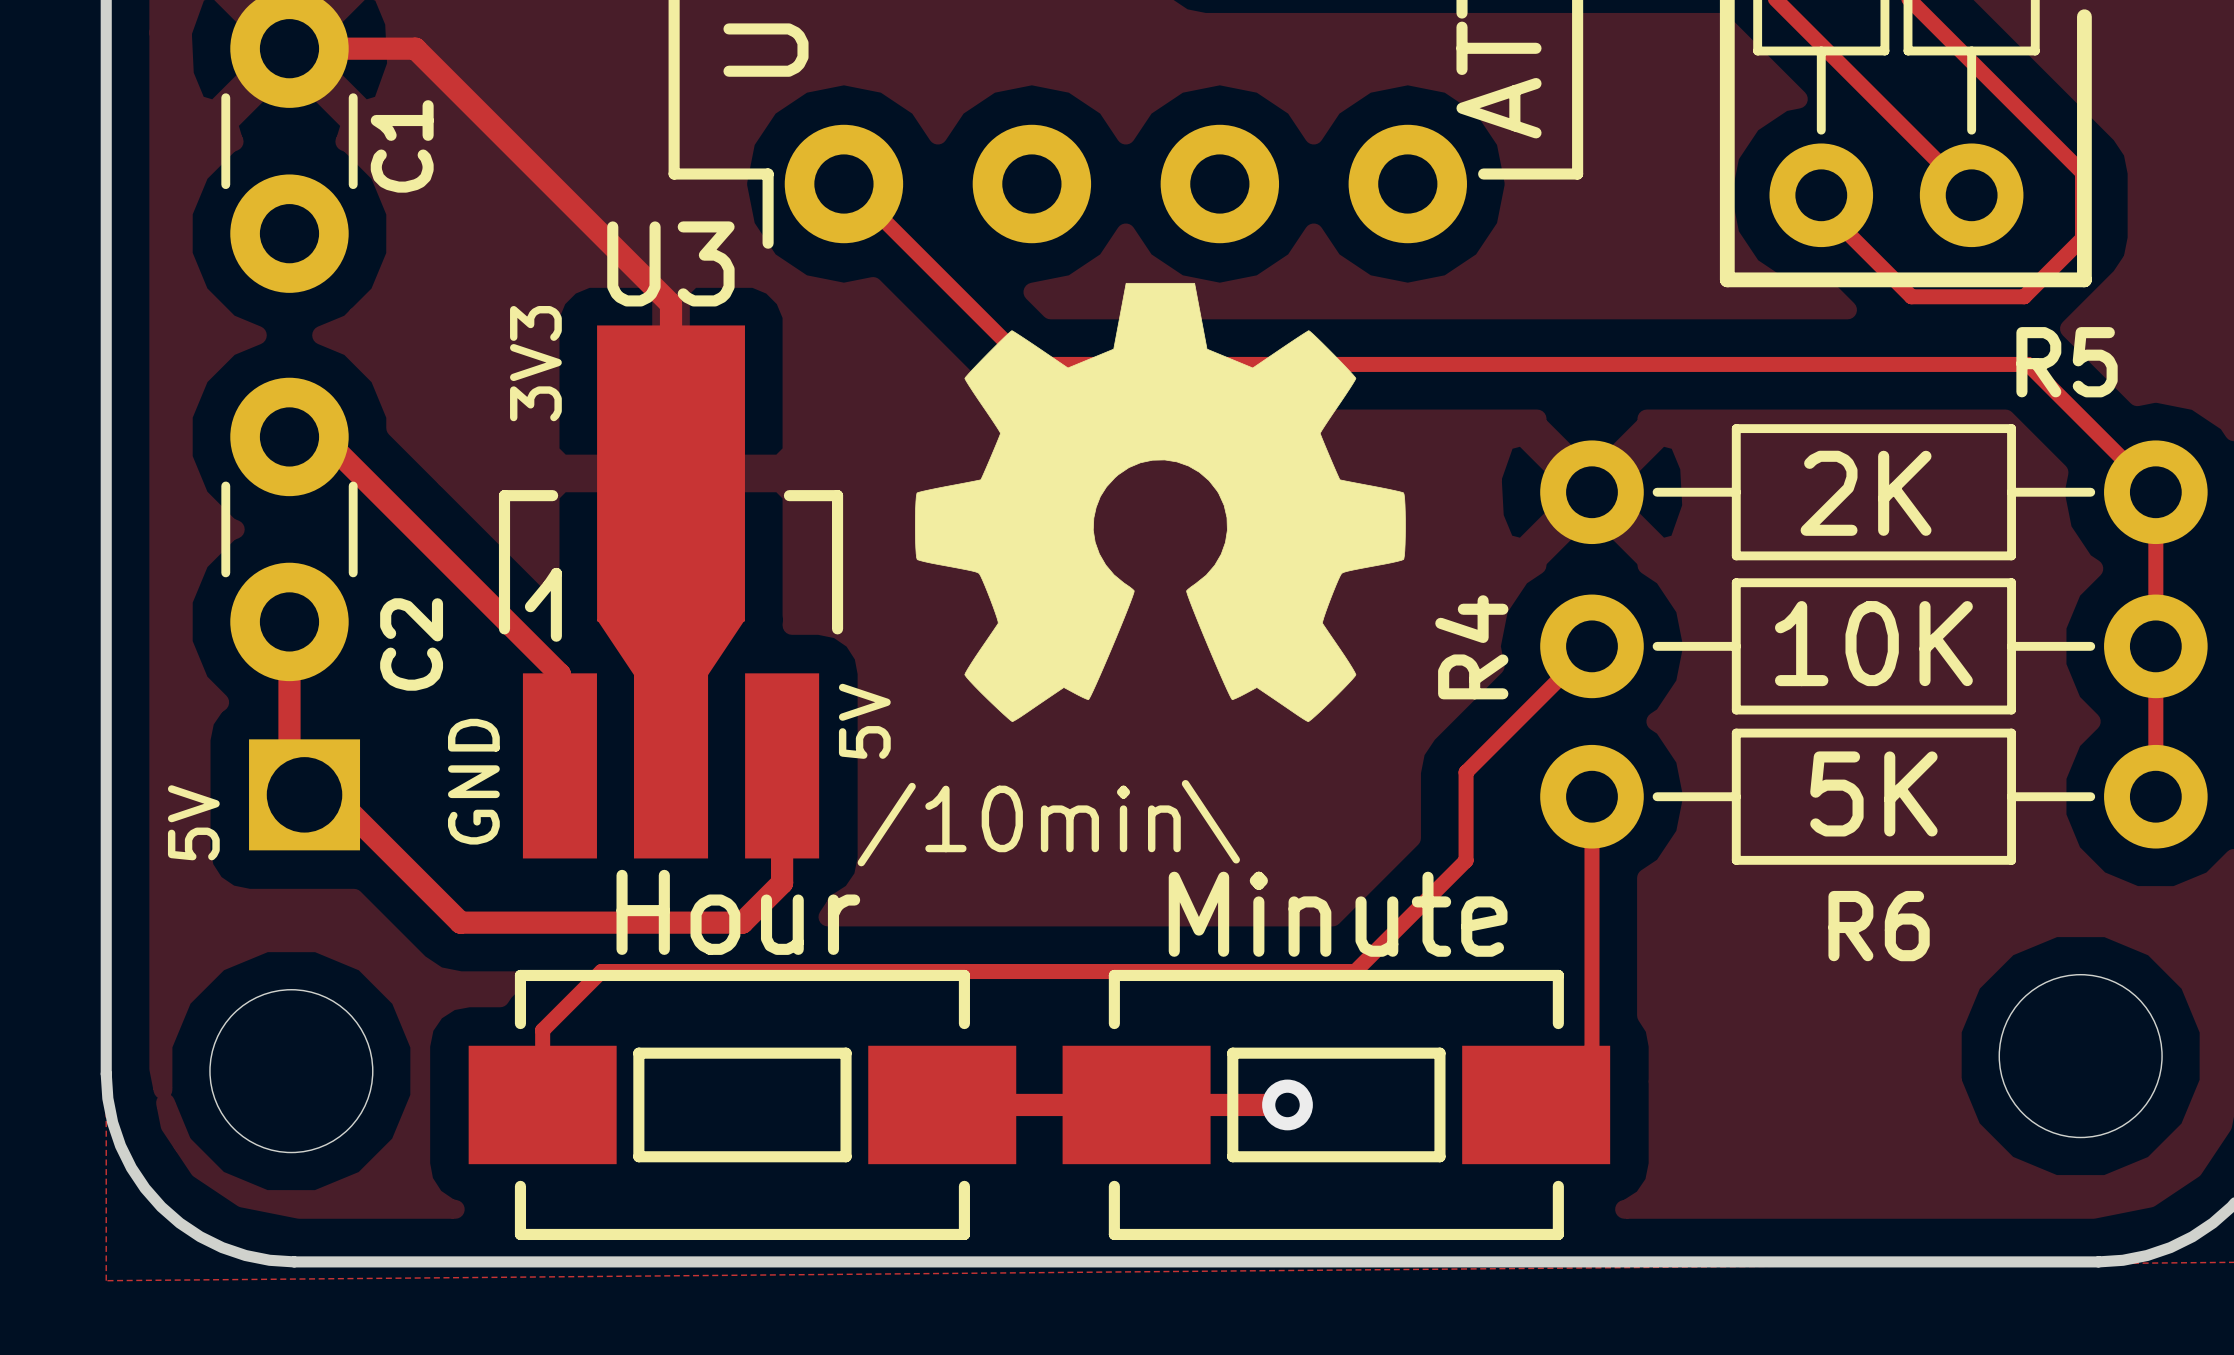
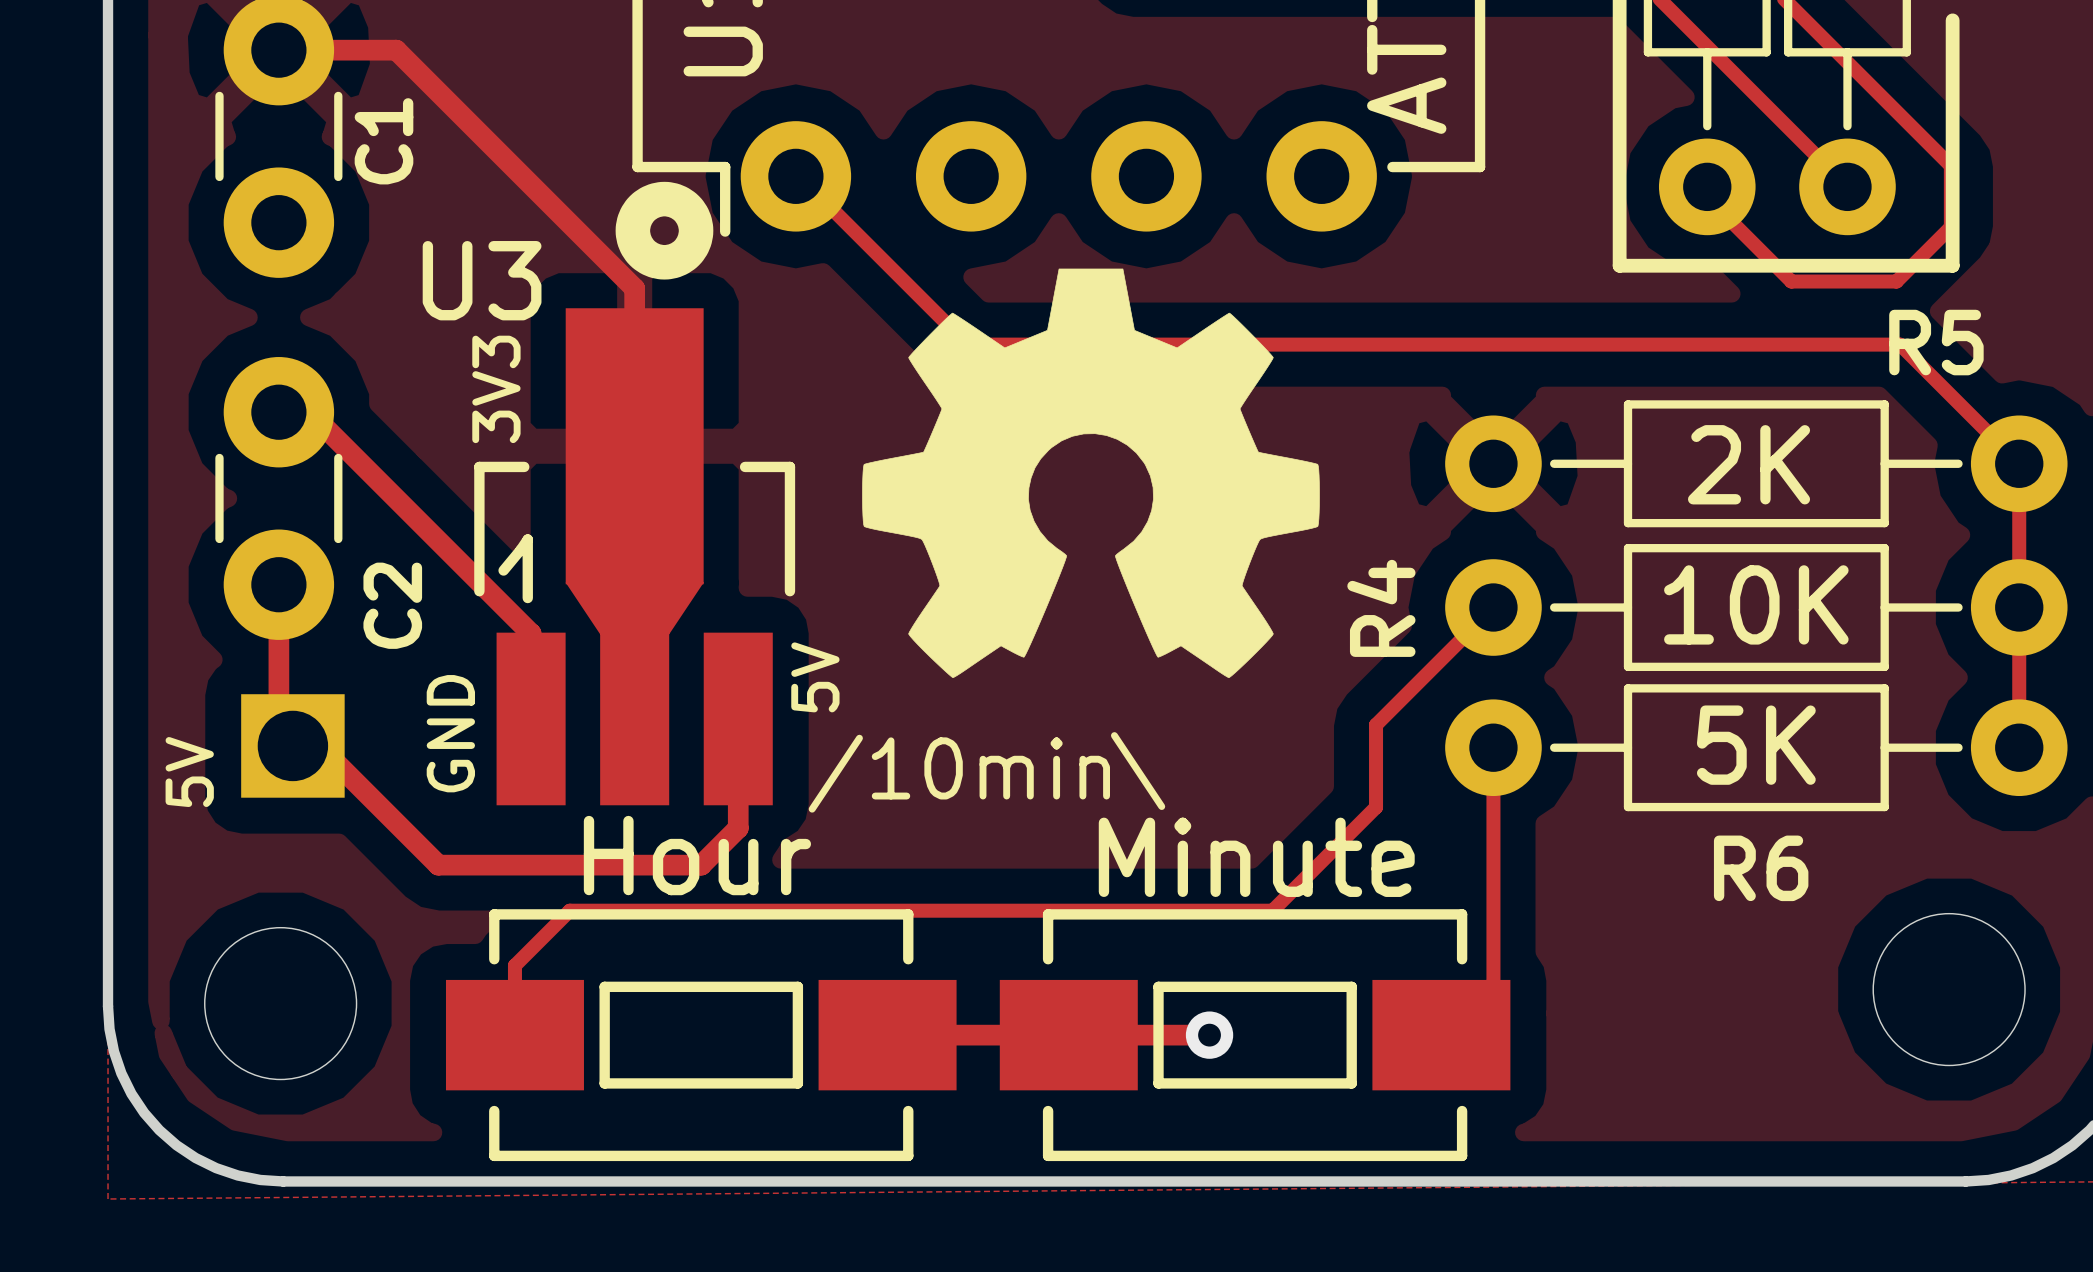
drawing: none -> [615, 181, 714, 280]
U3 name position: U3 (670, 263) -> U3 (482, 280)
text position: 3V3 (535, 363) -> 3V3 (496, 389)

